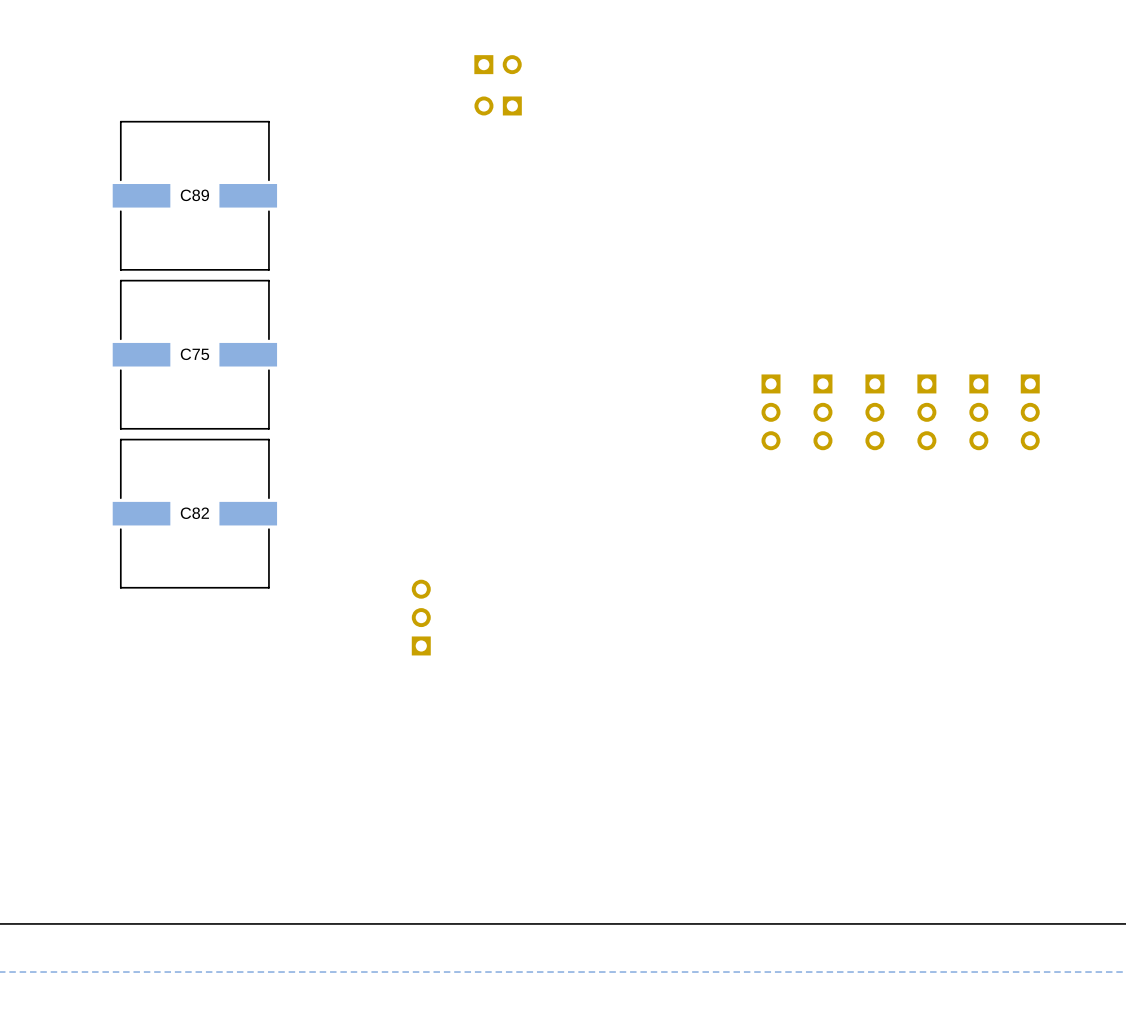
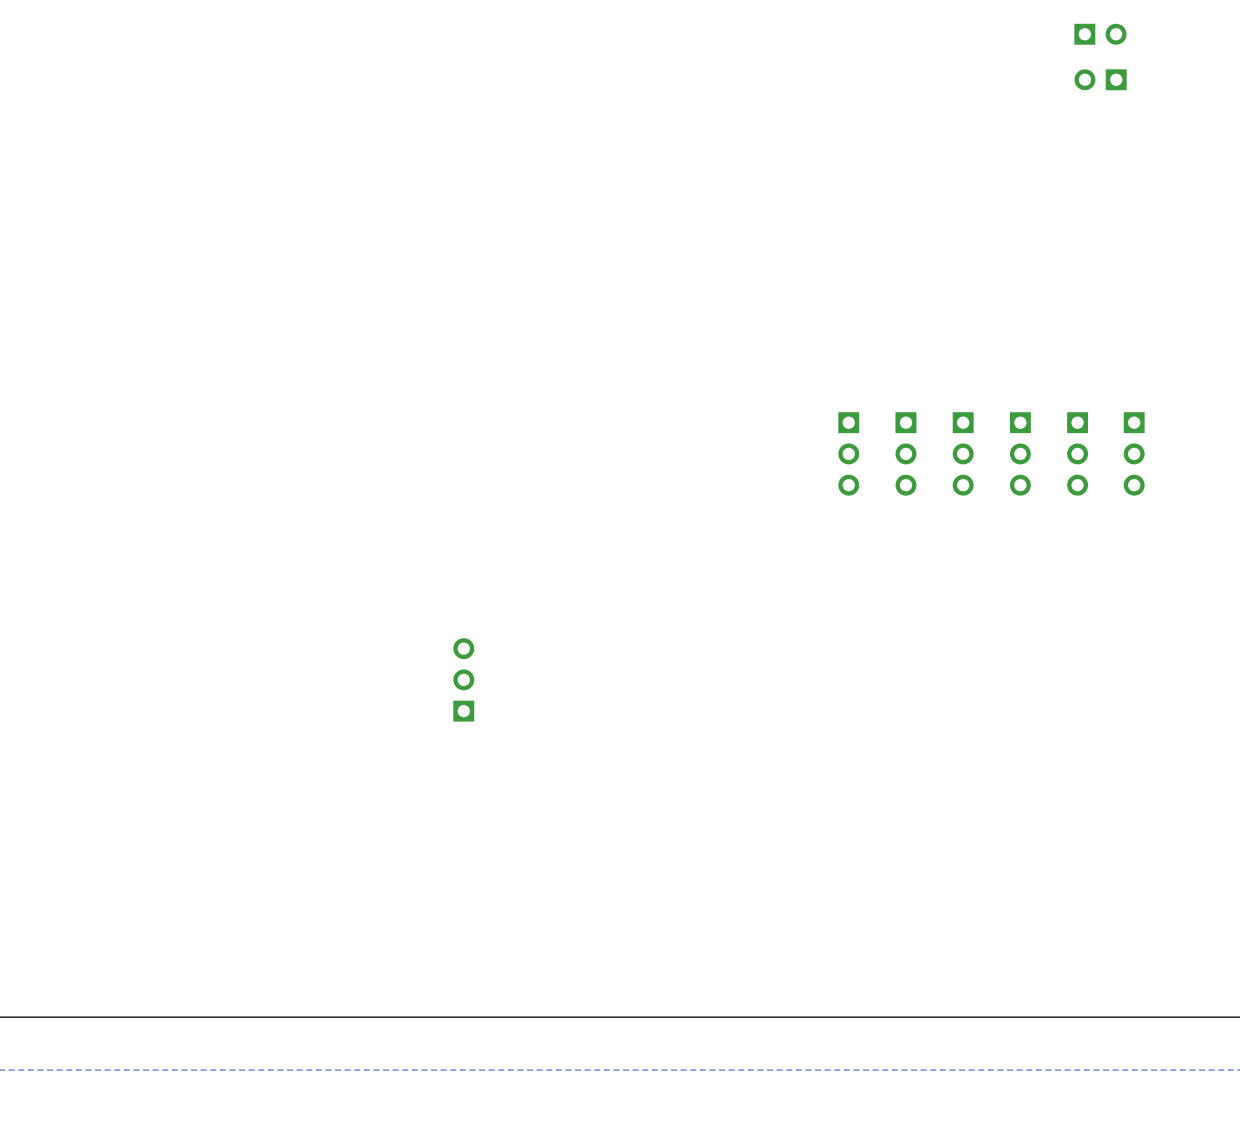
part: none -> (1100, 34)
part: (498, 64) -> none
part: none -> (1100, 79)
part: (498, 105) -> none
C89: (194, 195) -> none
C75: (194, 354) -> none
C82: (194, 513) -> none

